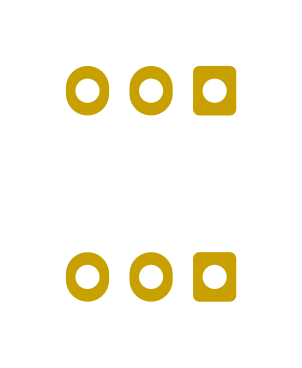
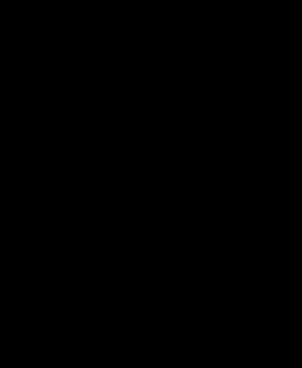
part: (151, 90) -> none
part: (151, 276) -> none

